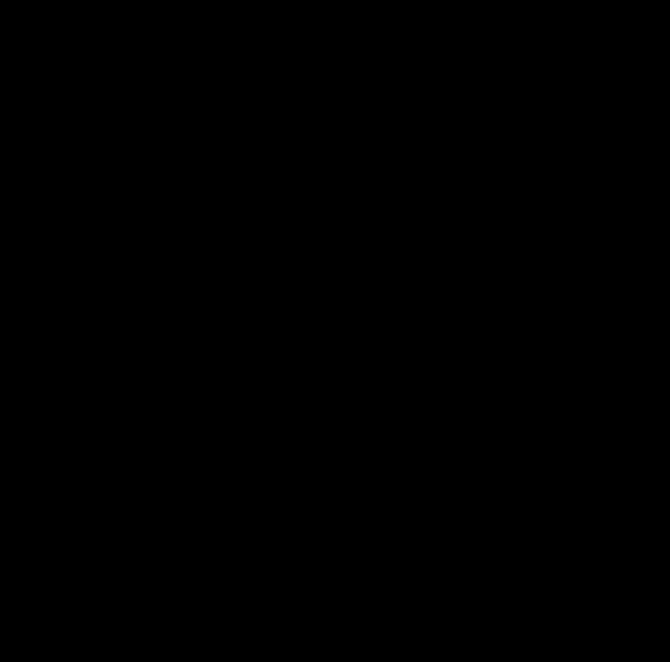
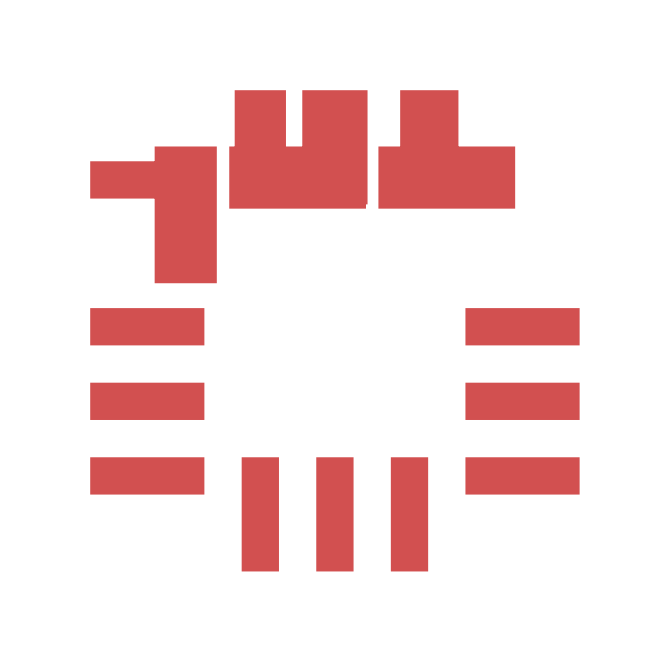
part: none -> (334, 330)

